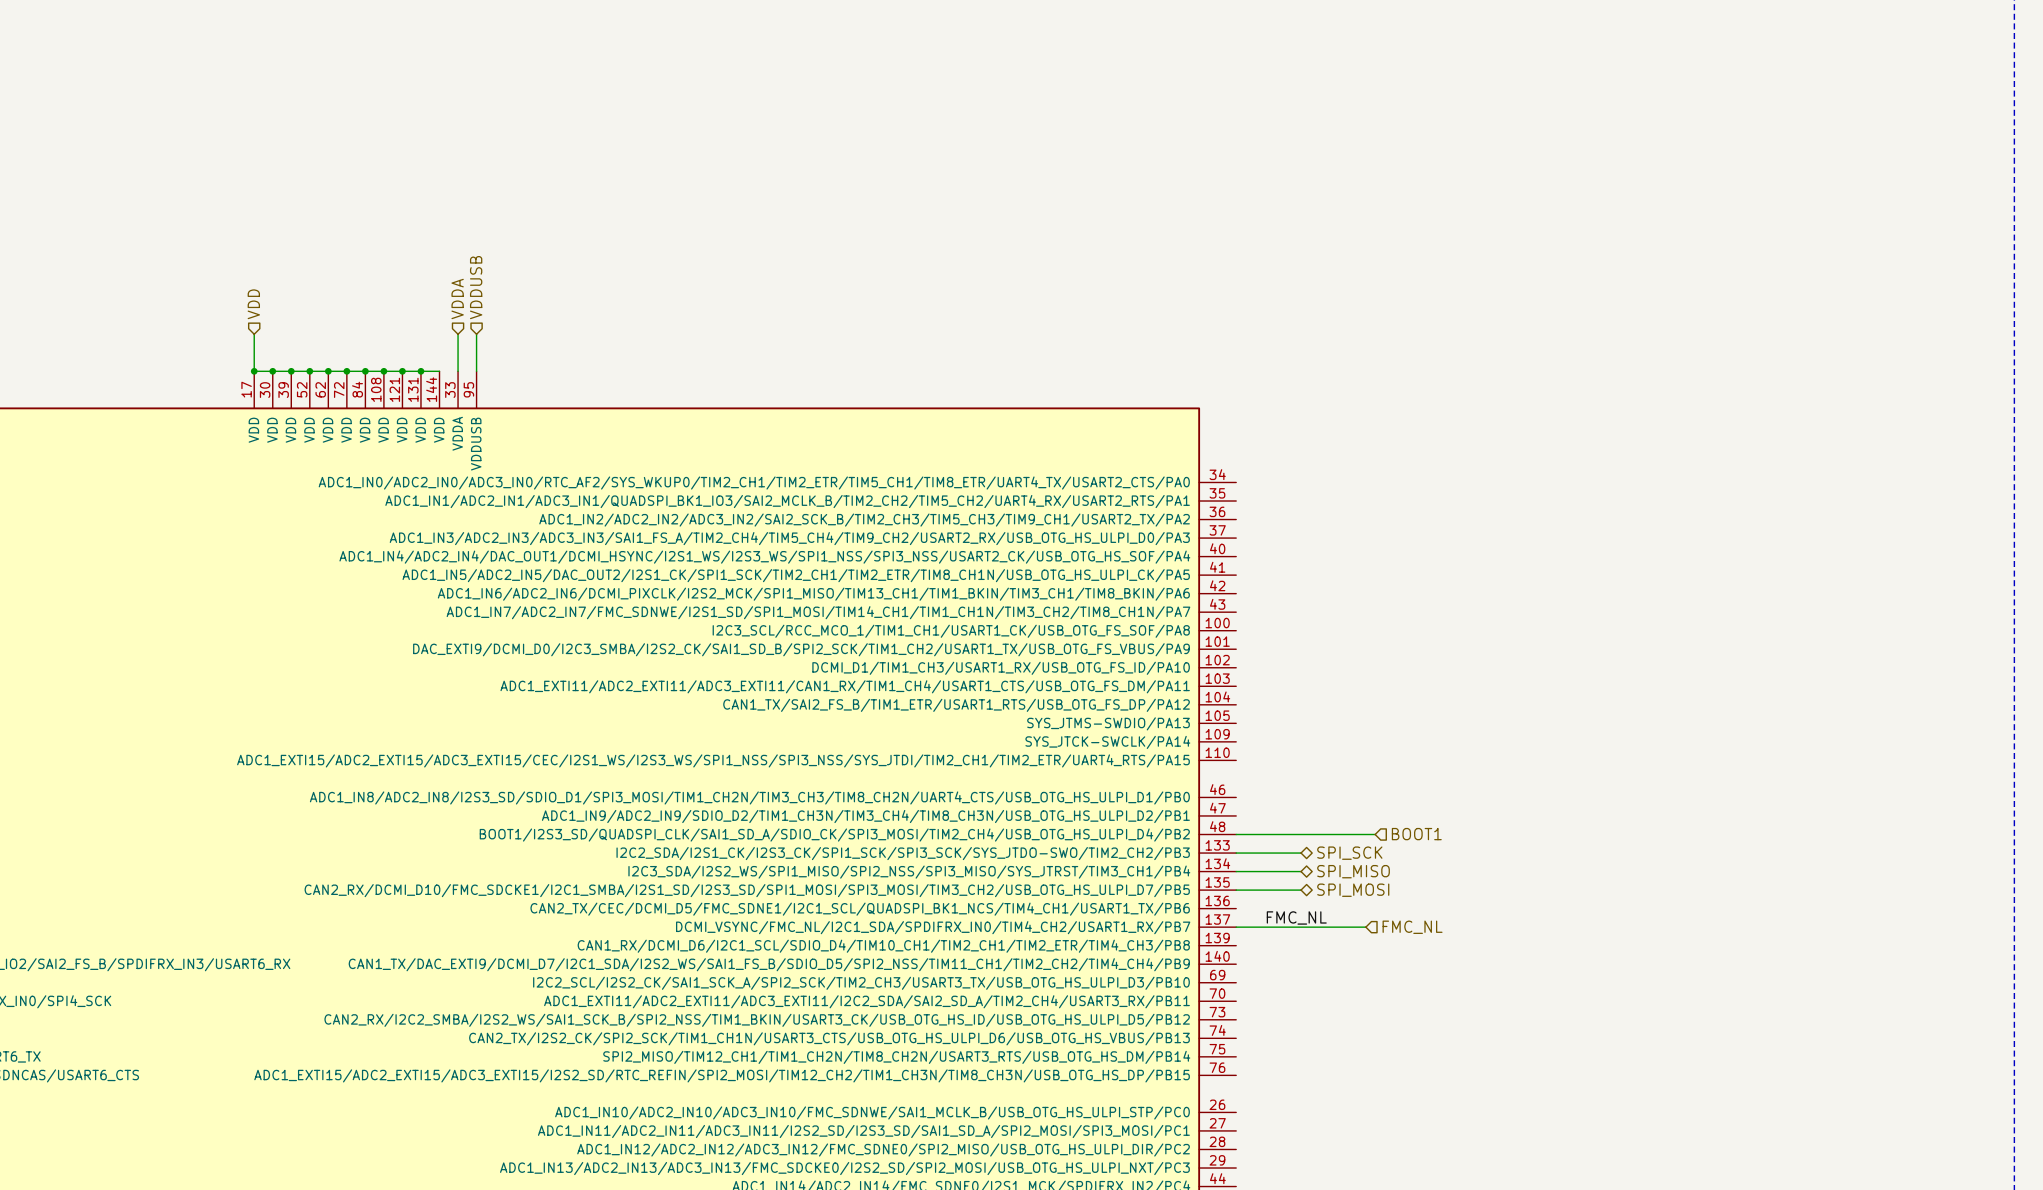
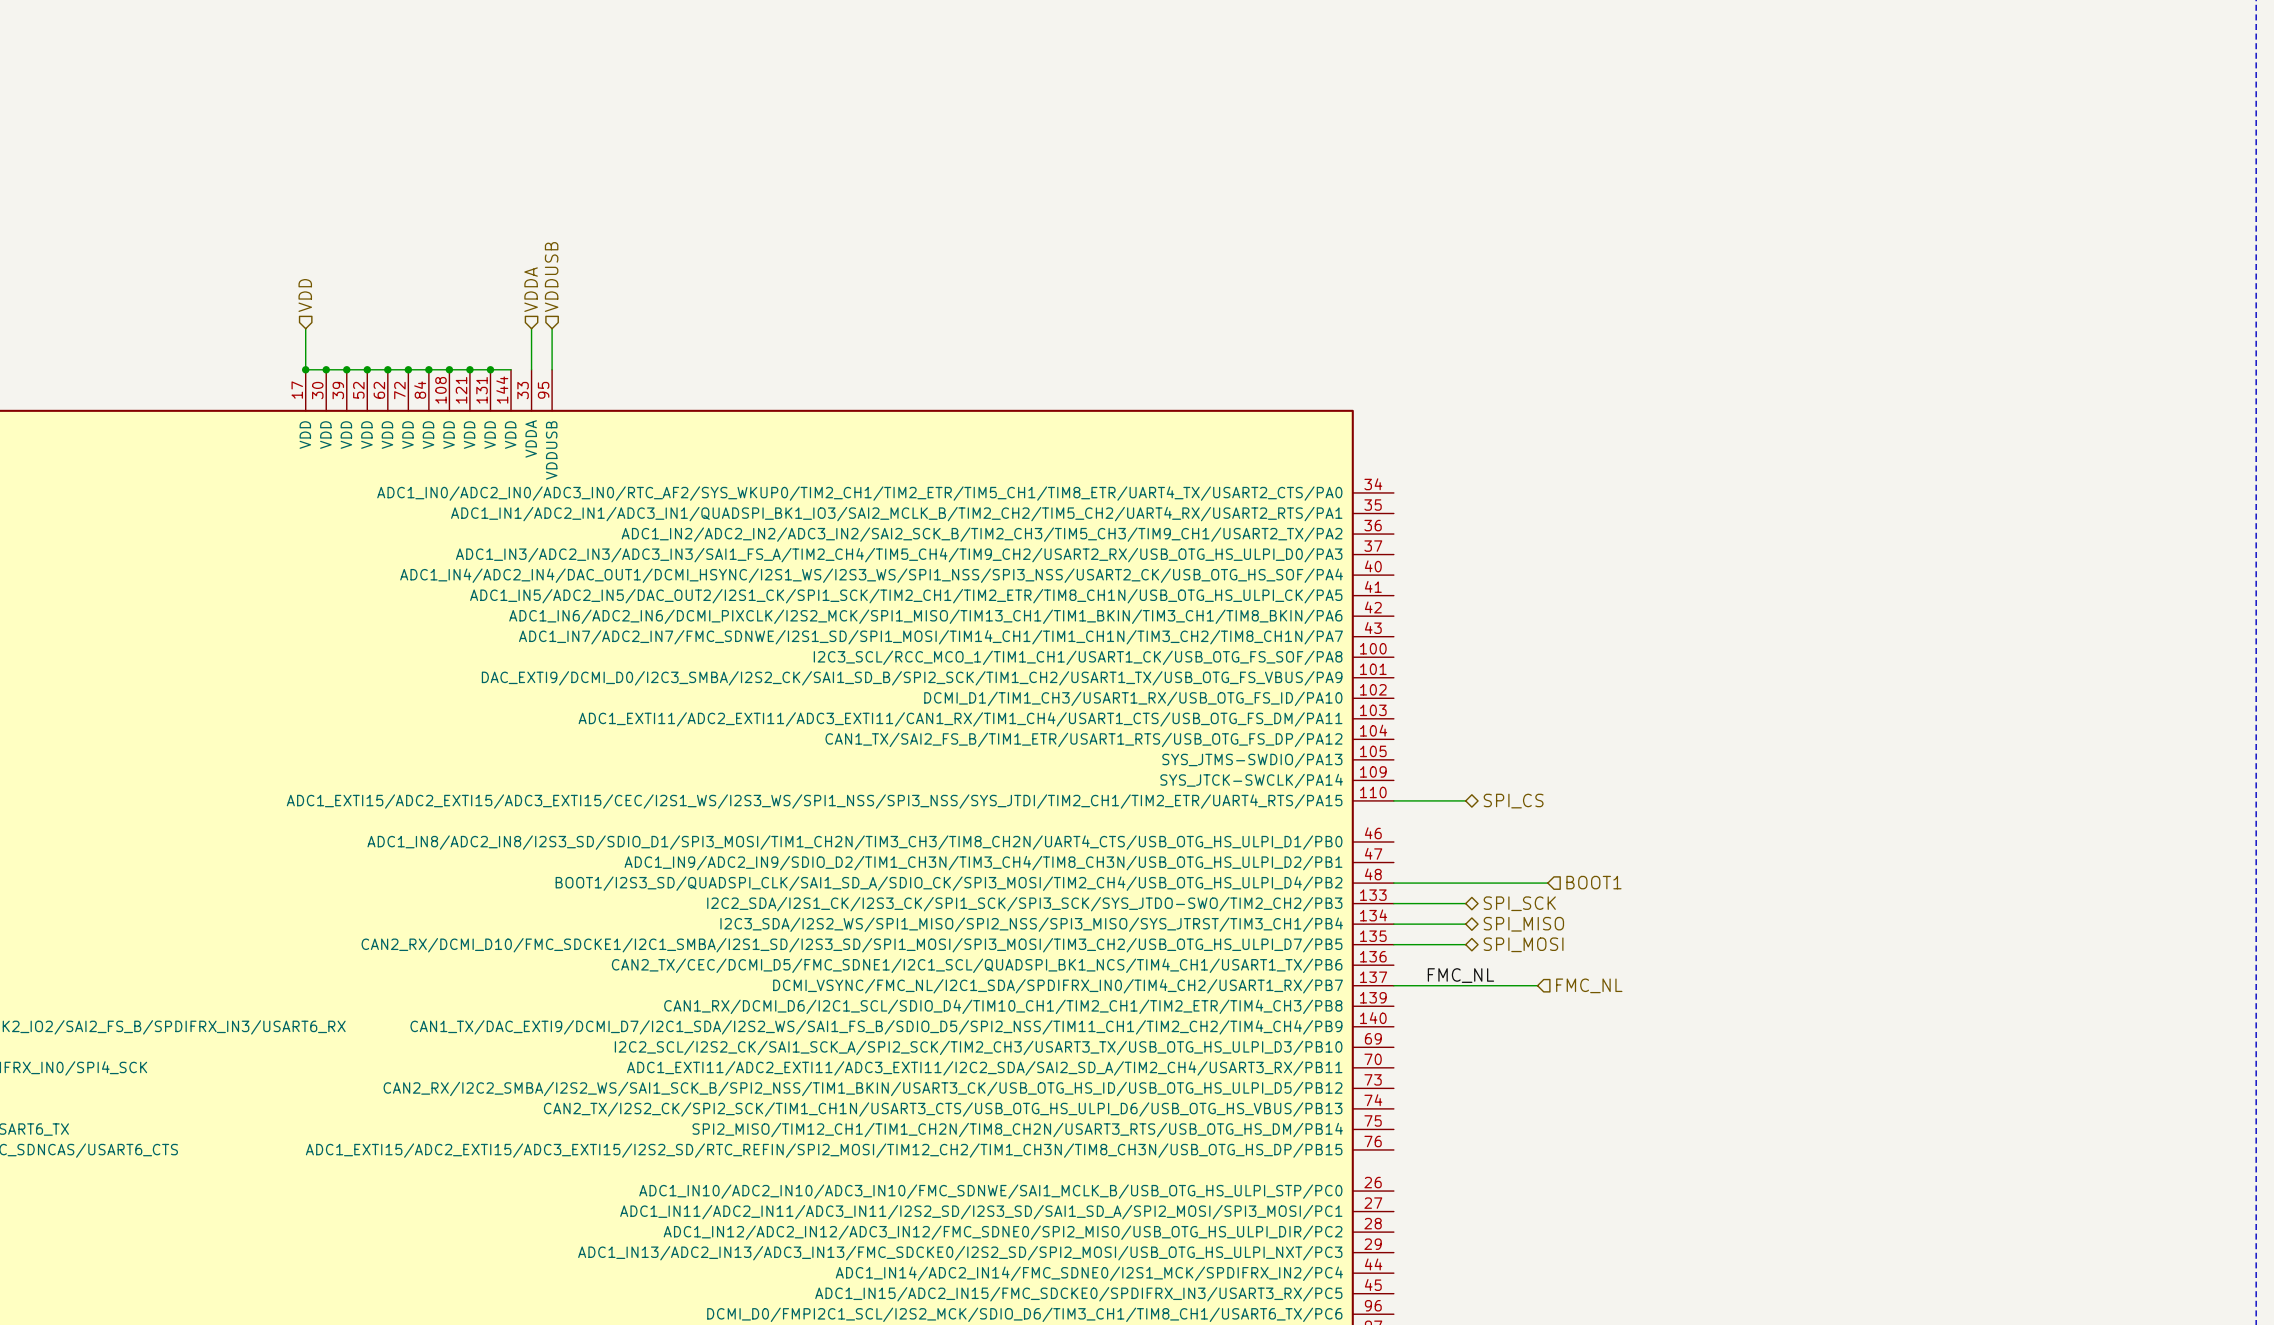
wire: none -> (1393, 800) (1465, 800)
hierarchical label: none -> SPI_CS (1513, 801)

